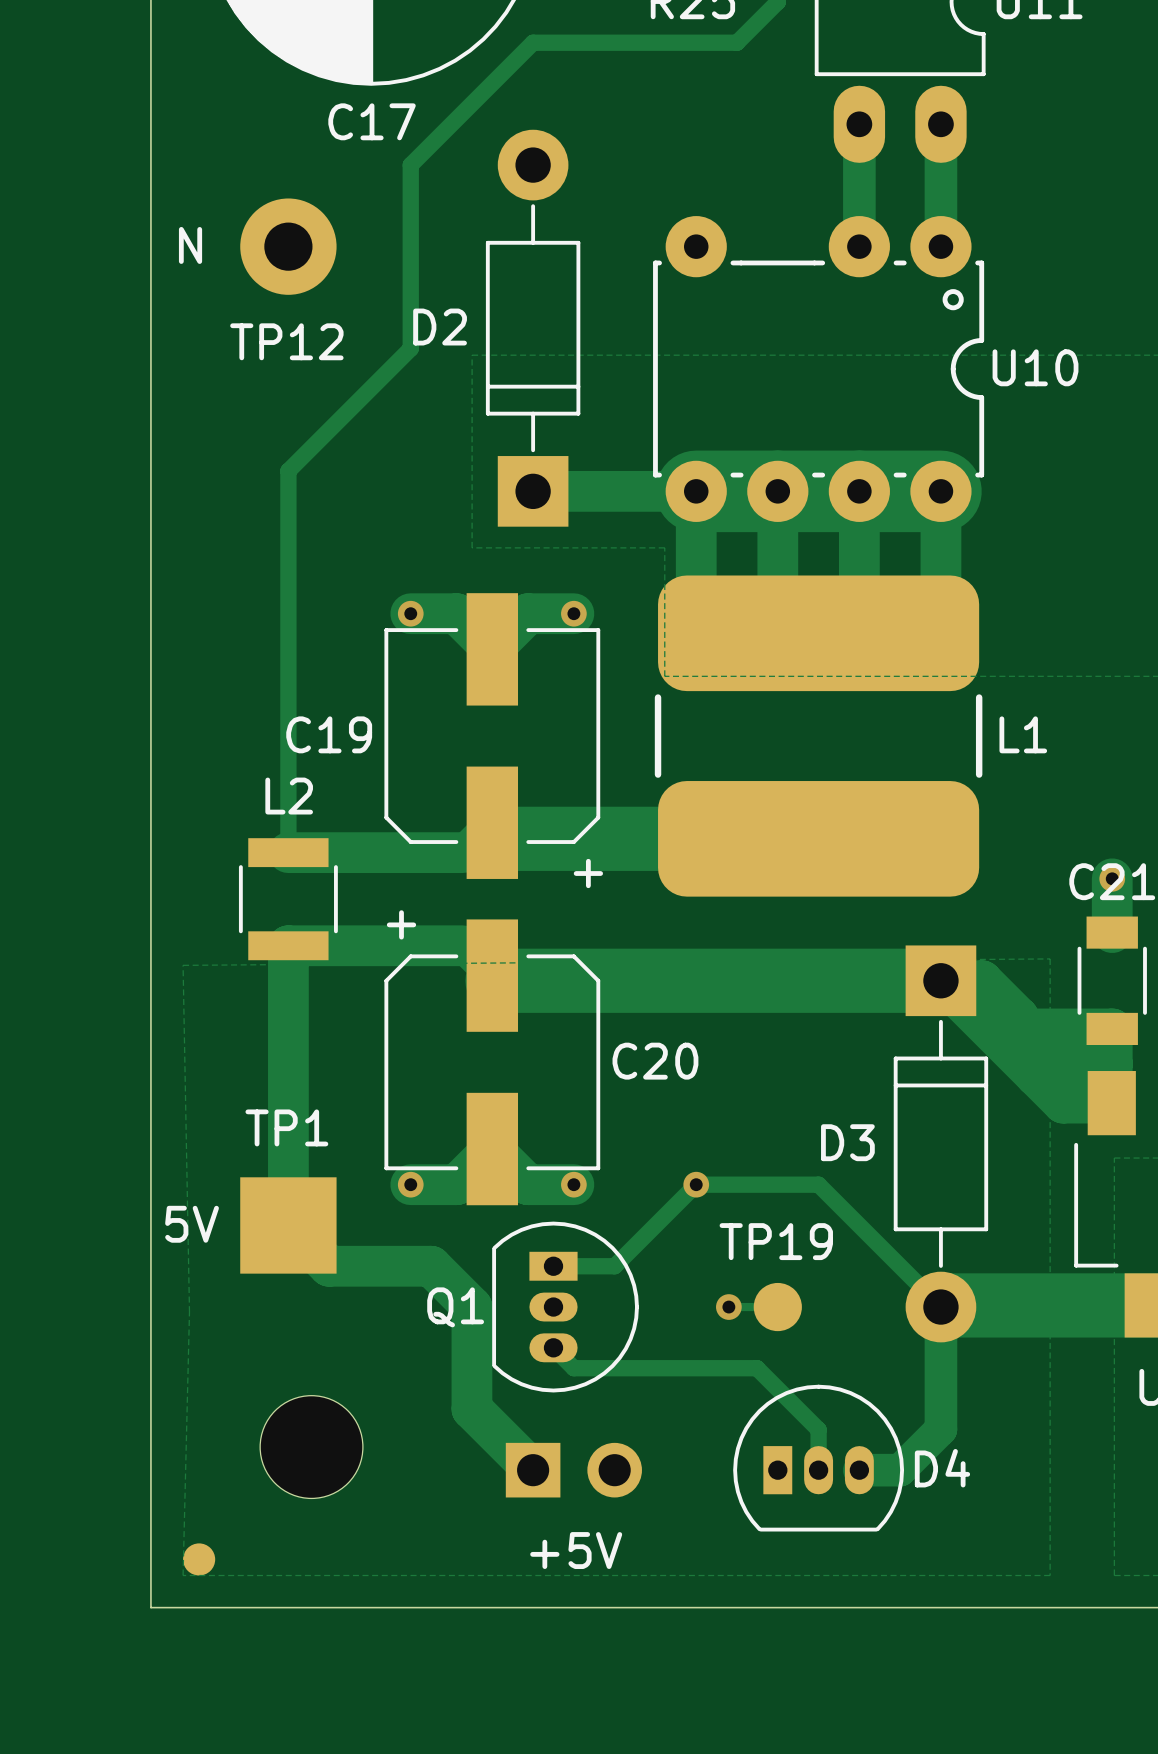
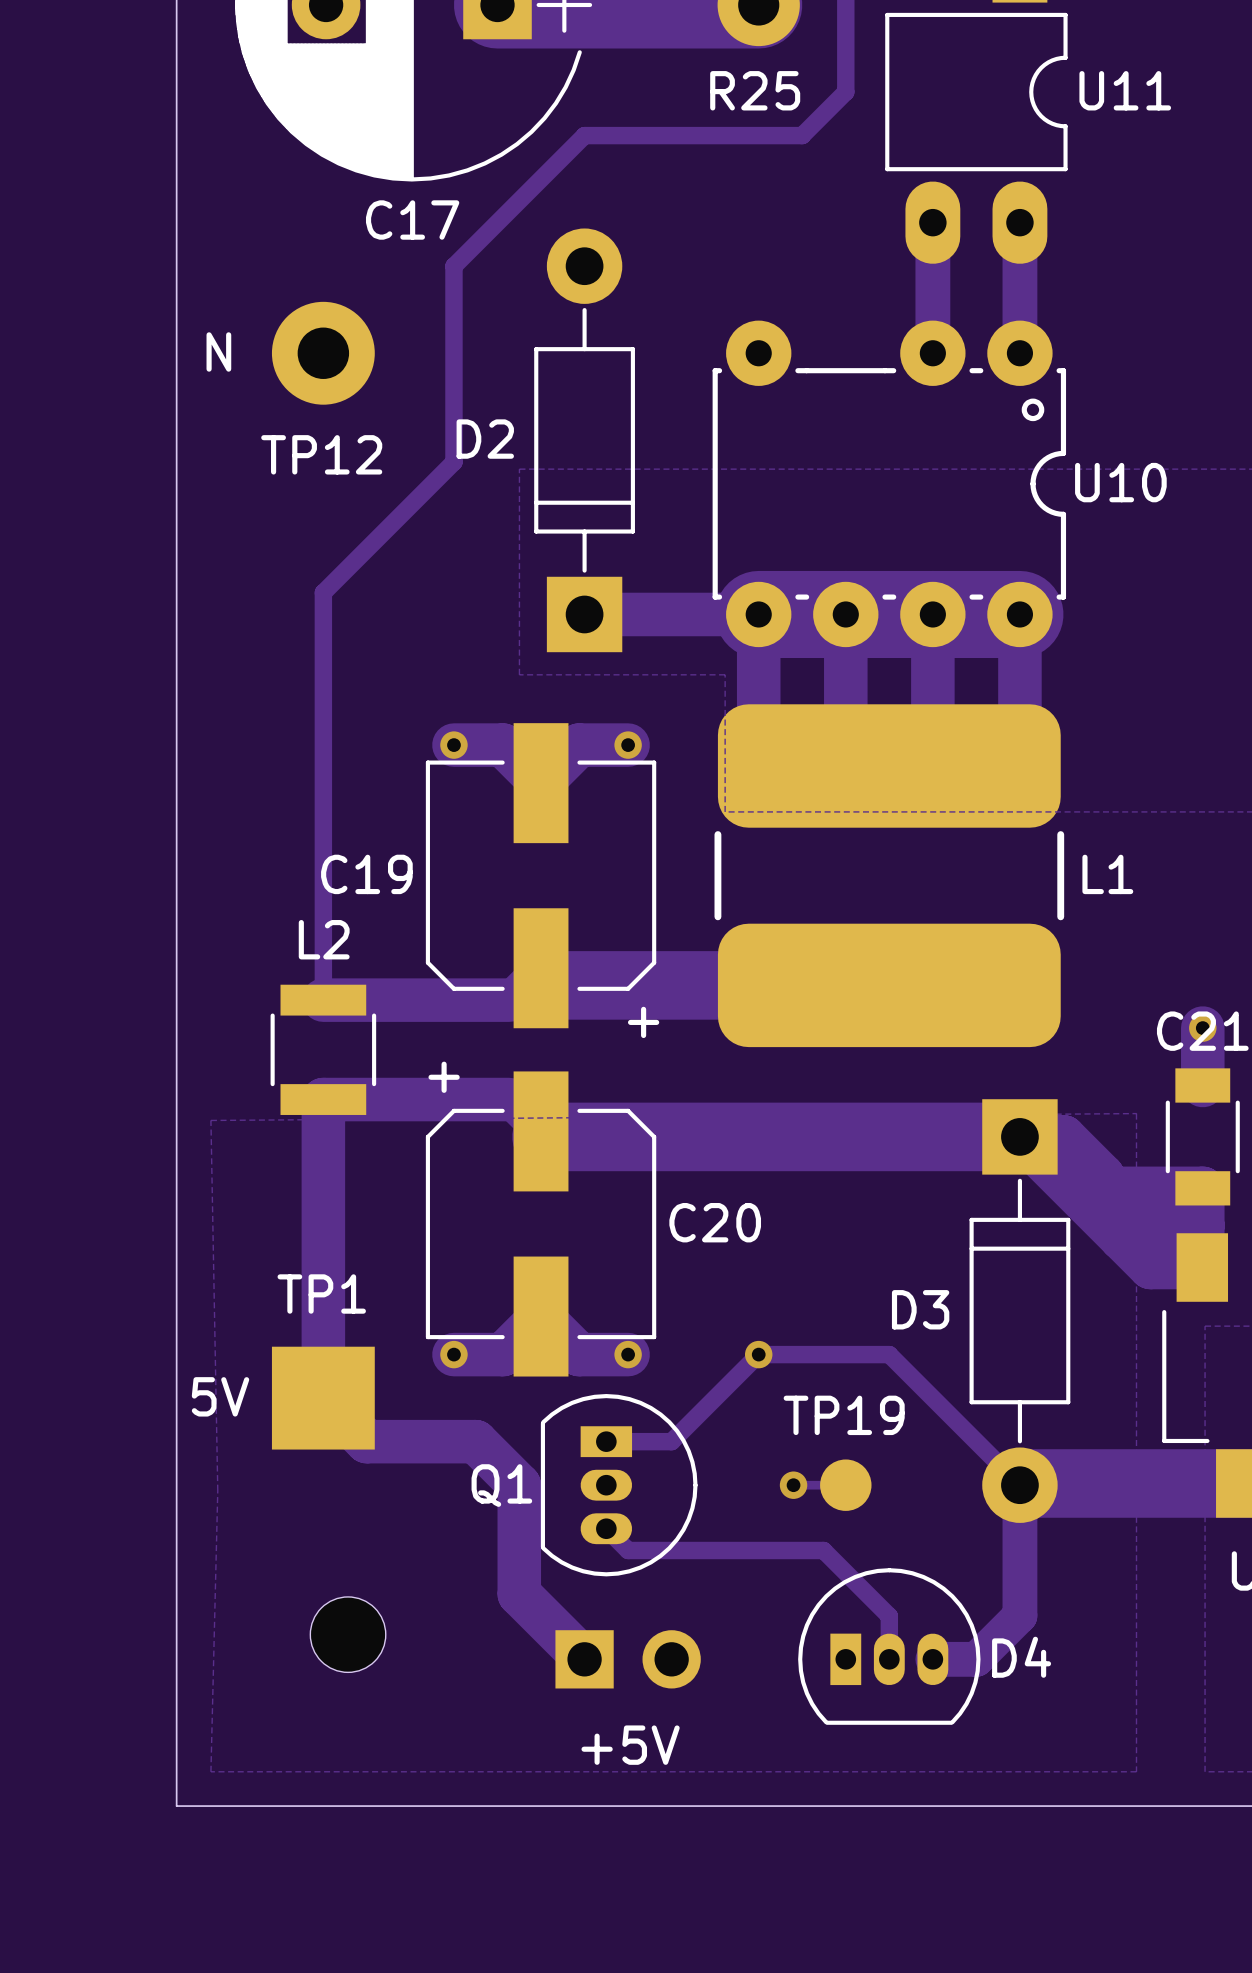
part footprint: [260, 1395, 363, 1499] -> [310, 1596, 386, 1673]
part: (199, 1559) -> none

